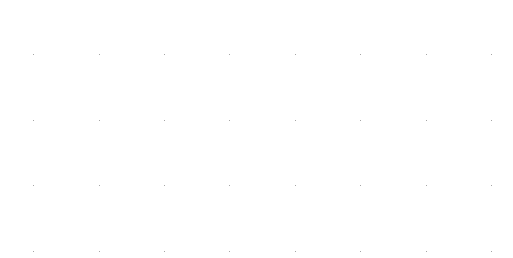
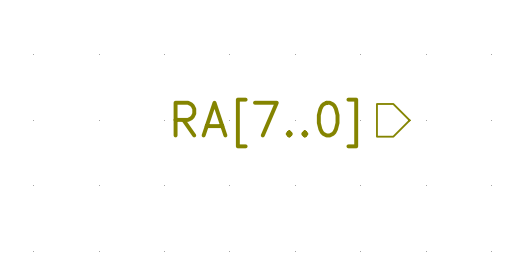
hierarchical label: none -> RA[7..0] (265, 123)

